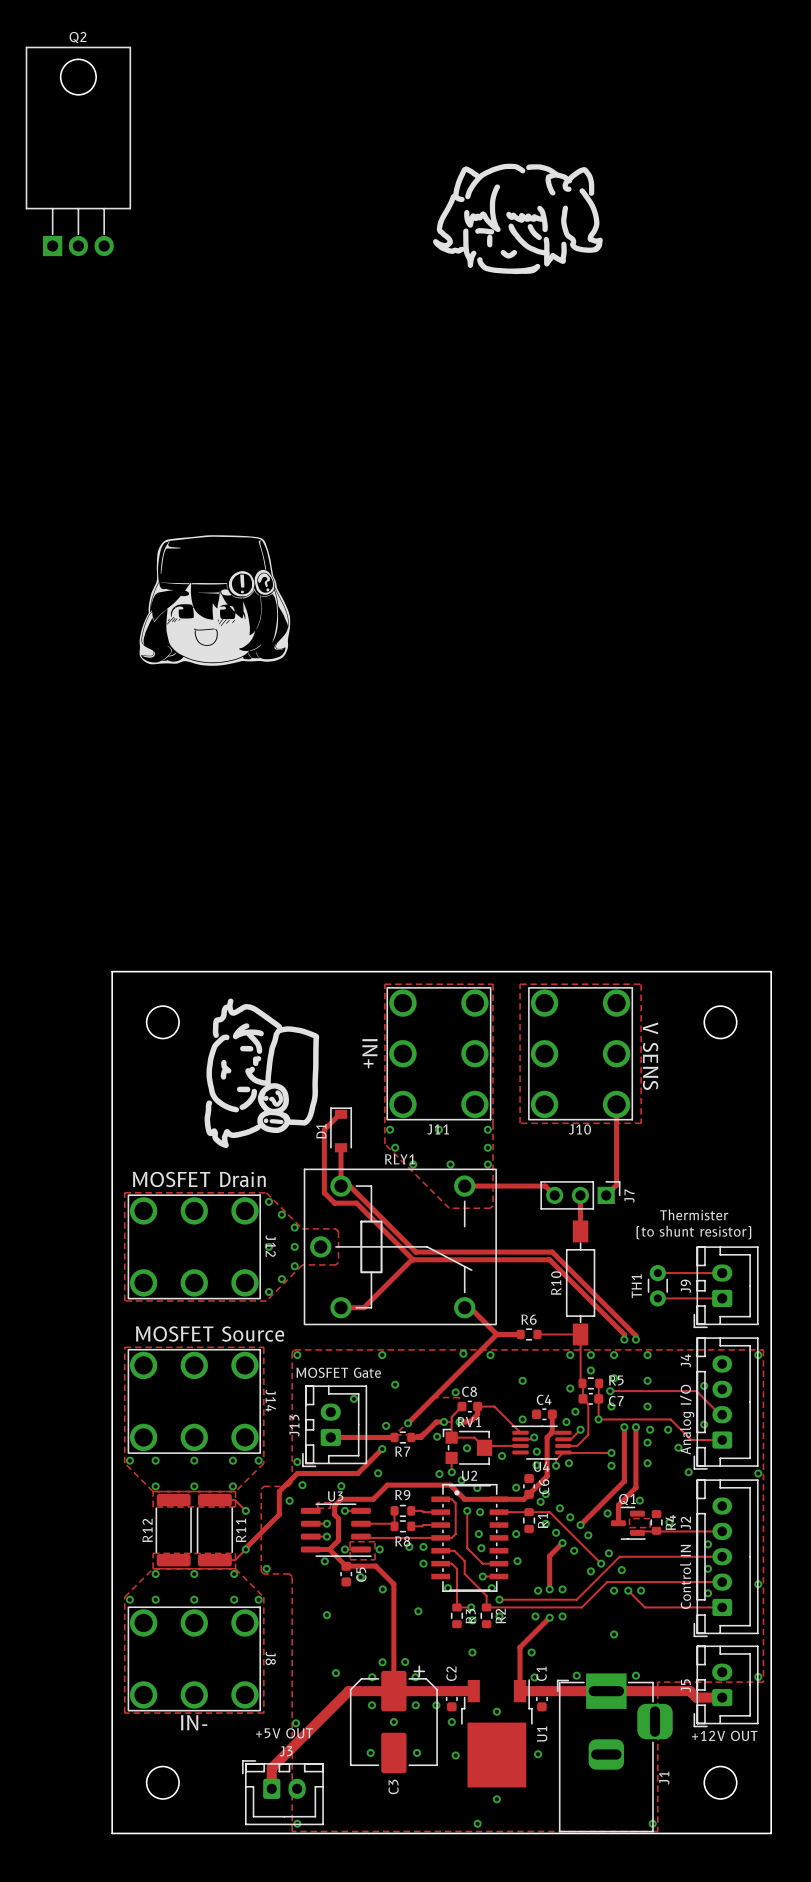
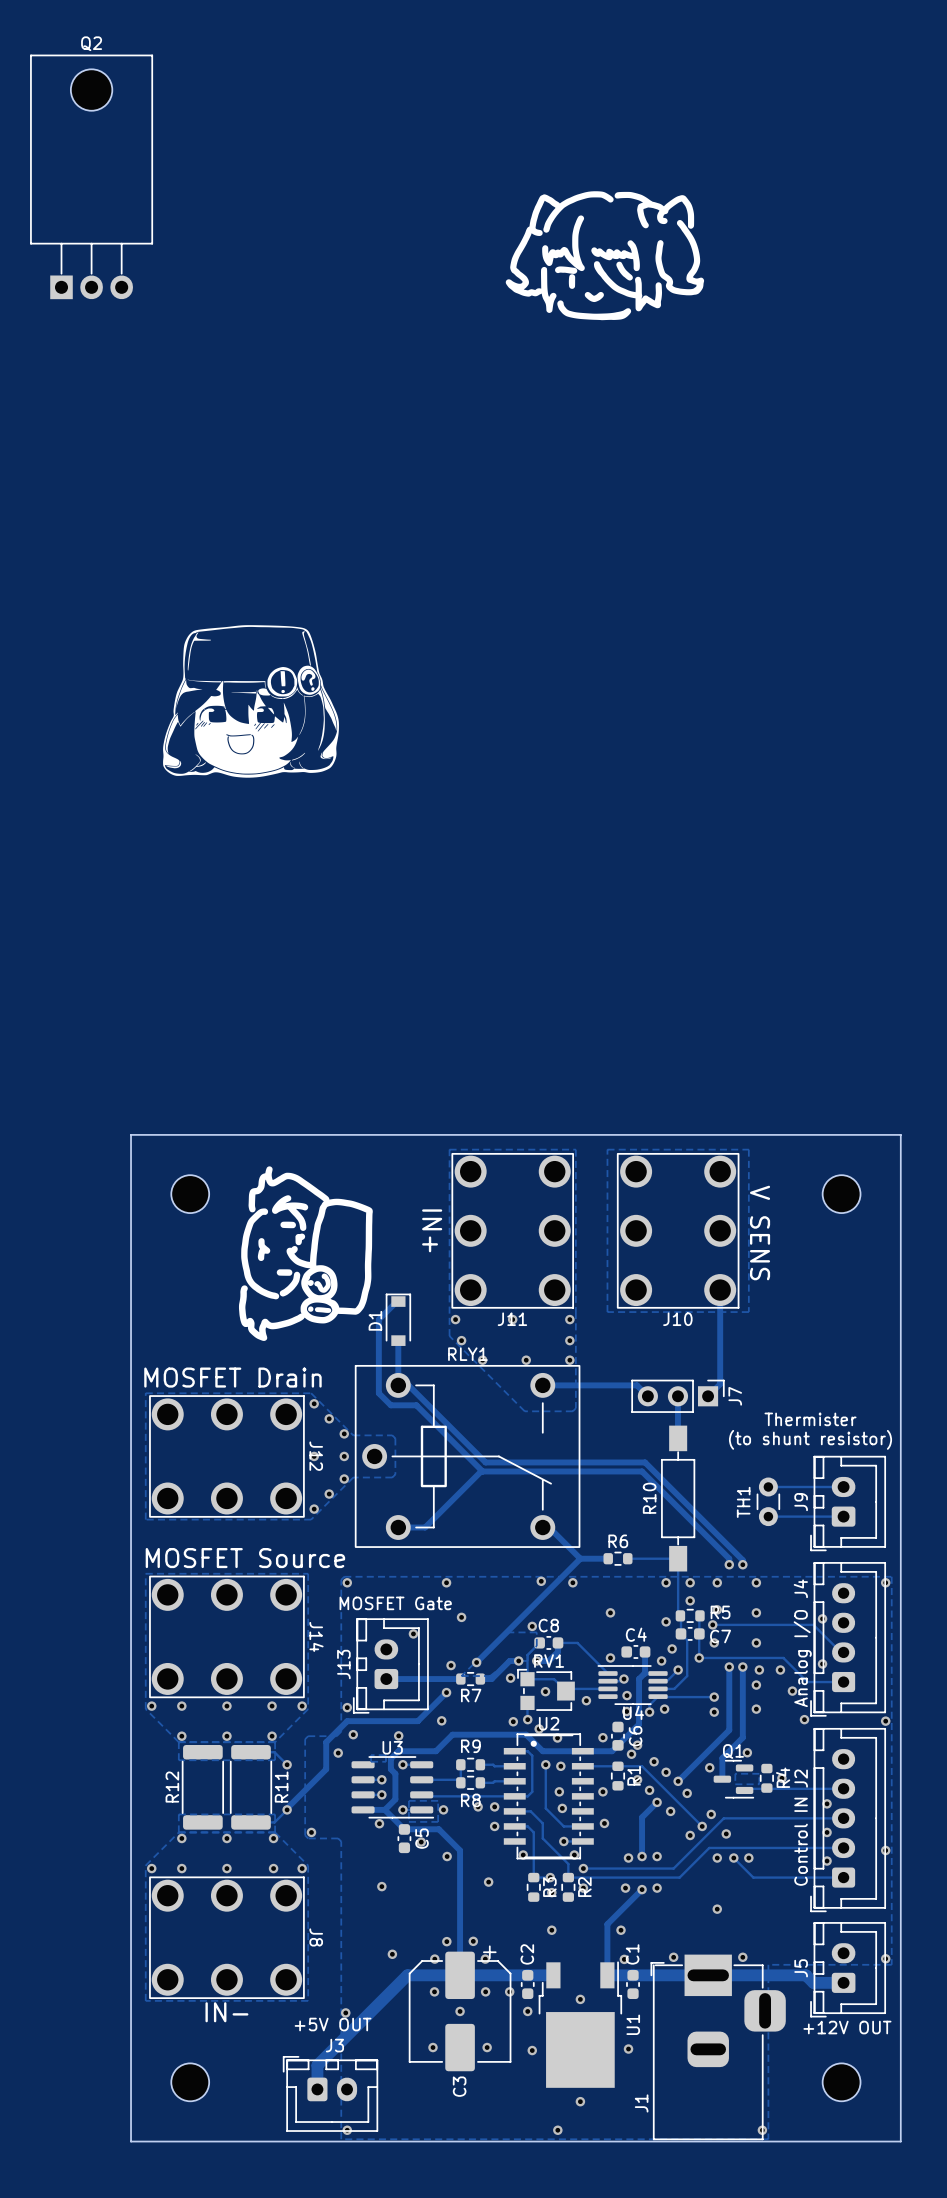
J1 name position: J1 (664, 1778) -> J1 (641, 2103)

